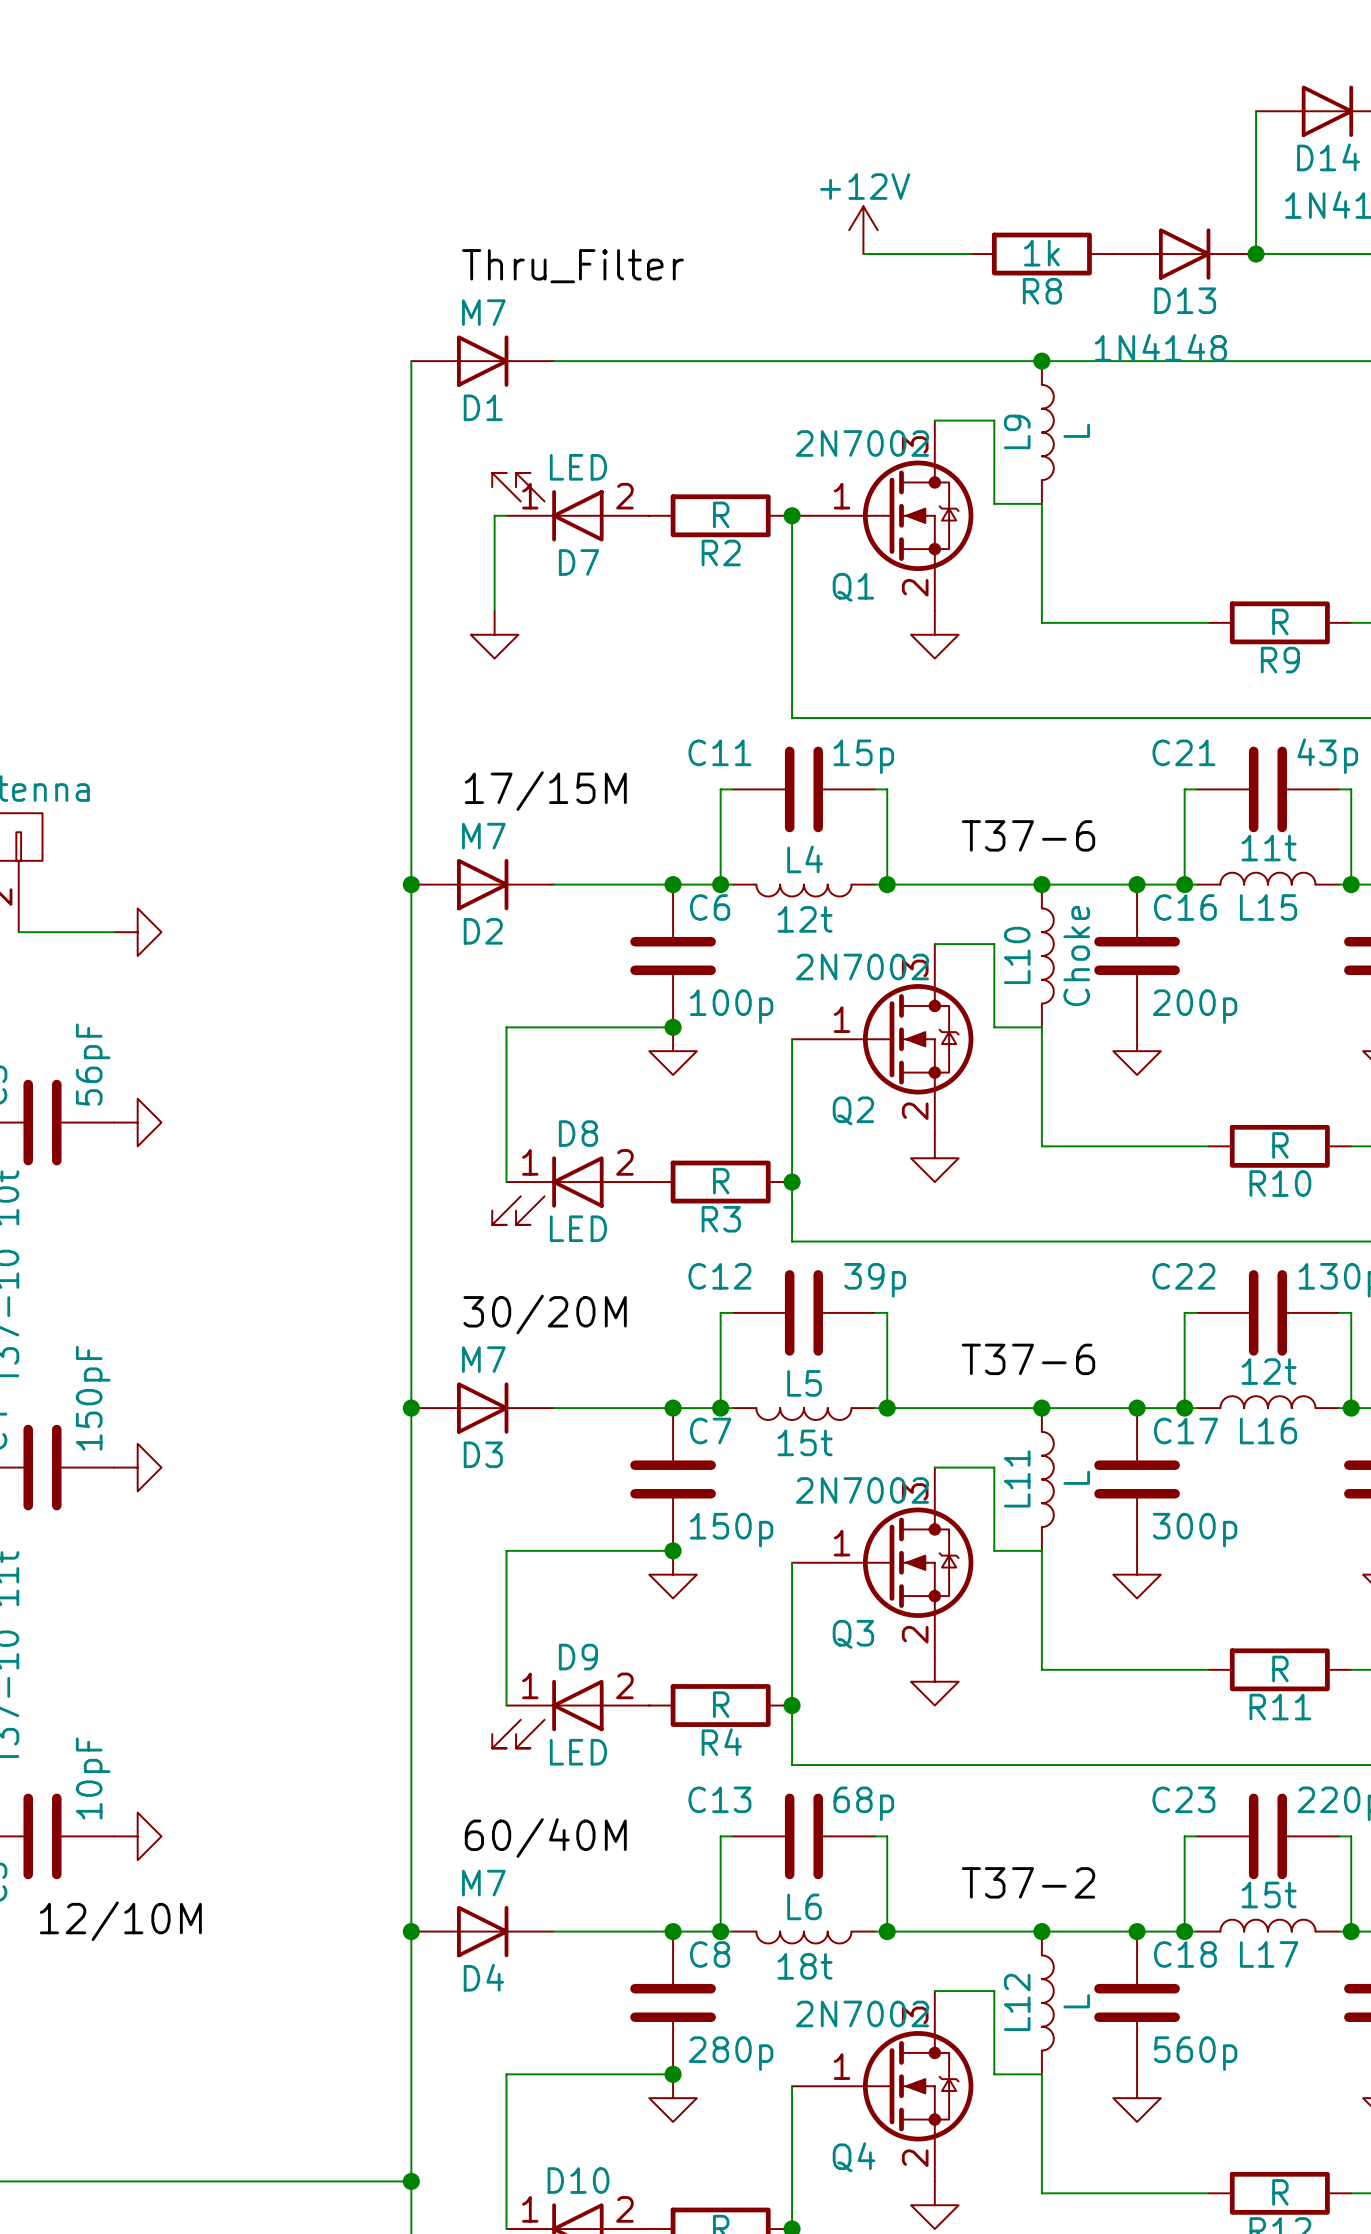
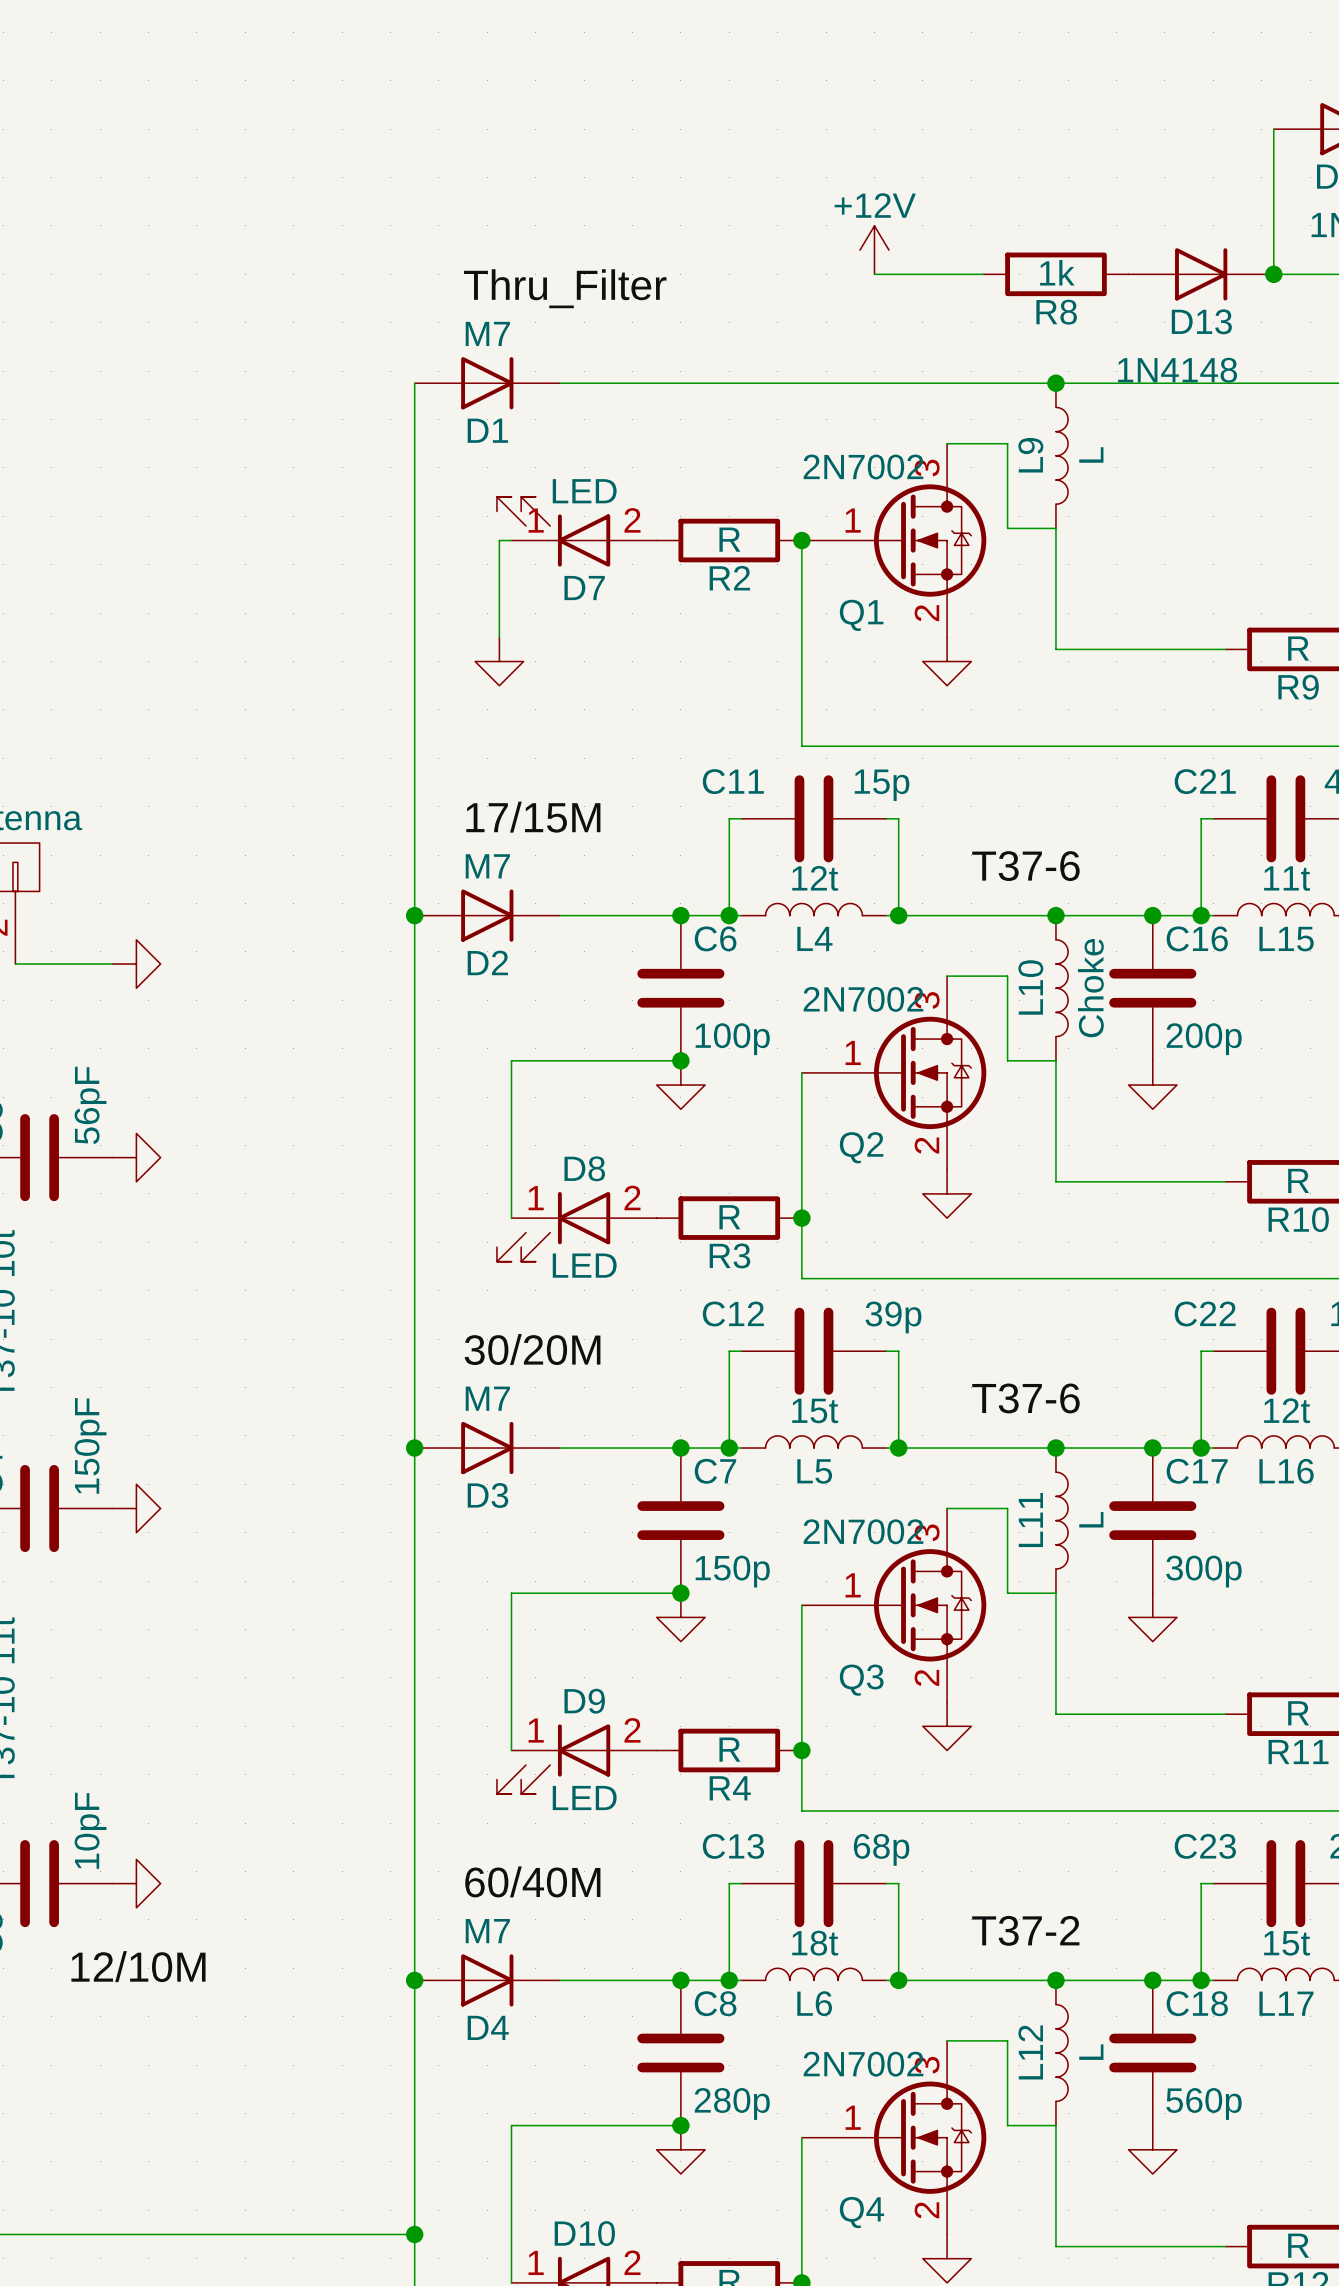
L4 rotation: 0° (803, 890) -> 180° (813, 909)
L5 rotation: 0° (803, 1414) -> 180° (813, 1441)
L6 rotation: 0° (803, 1937) -> 180° (813, 1974)

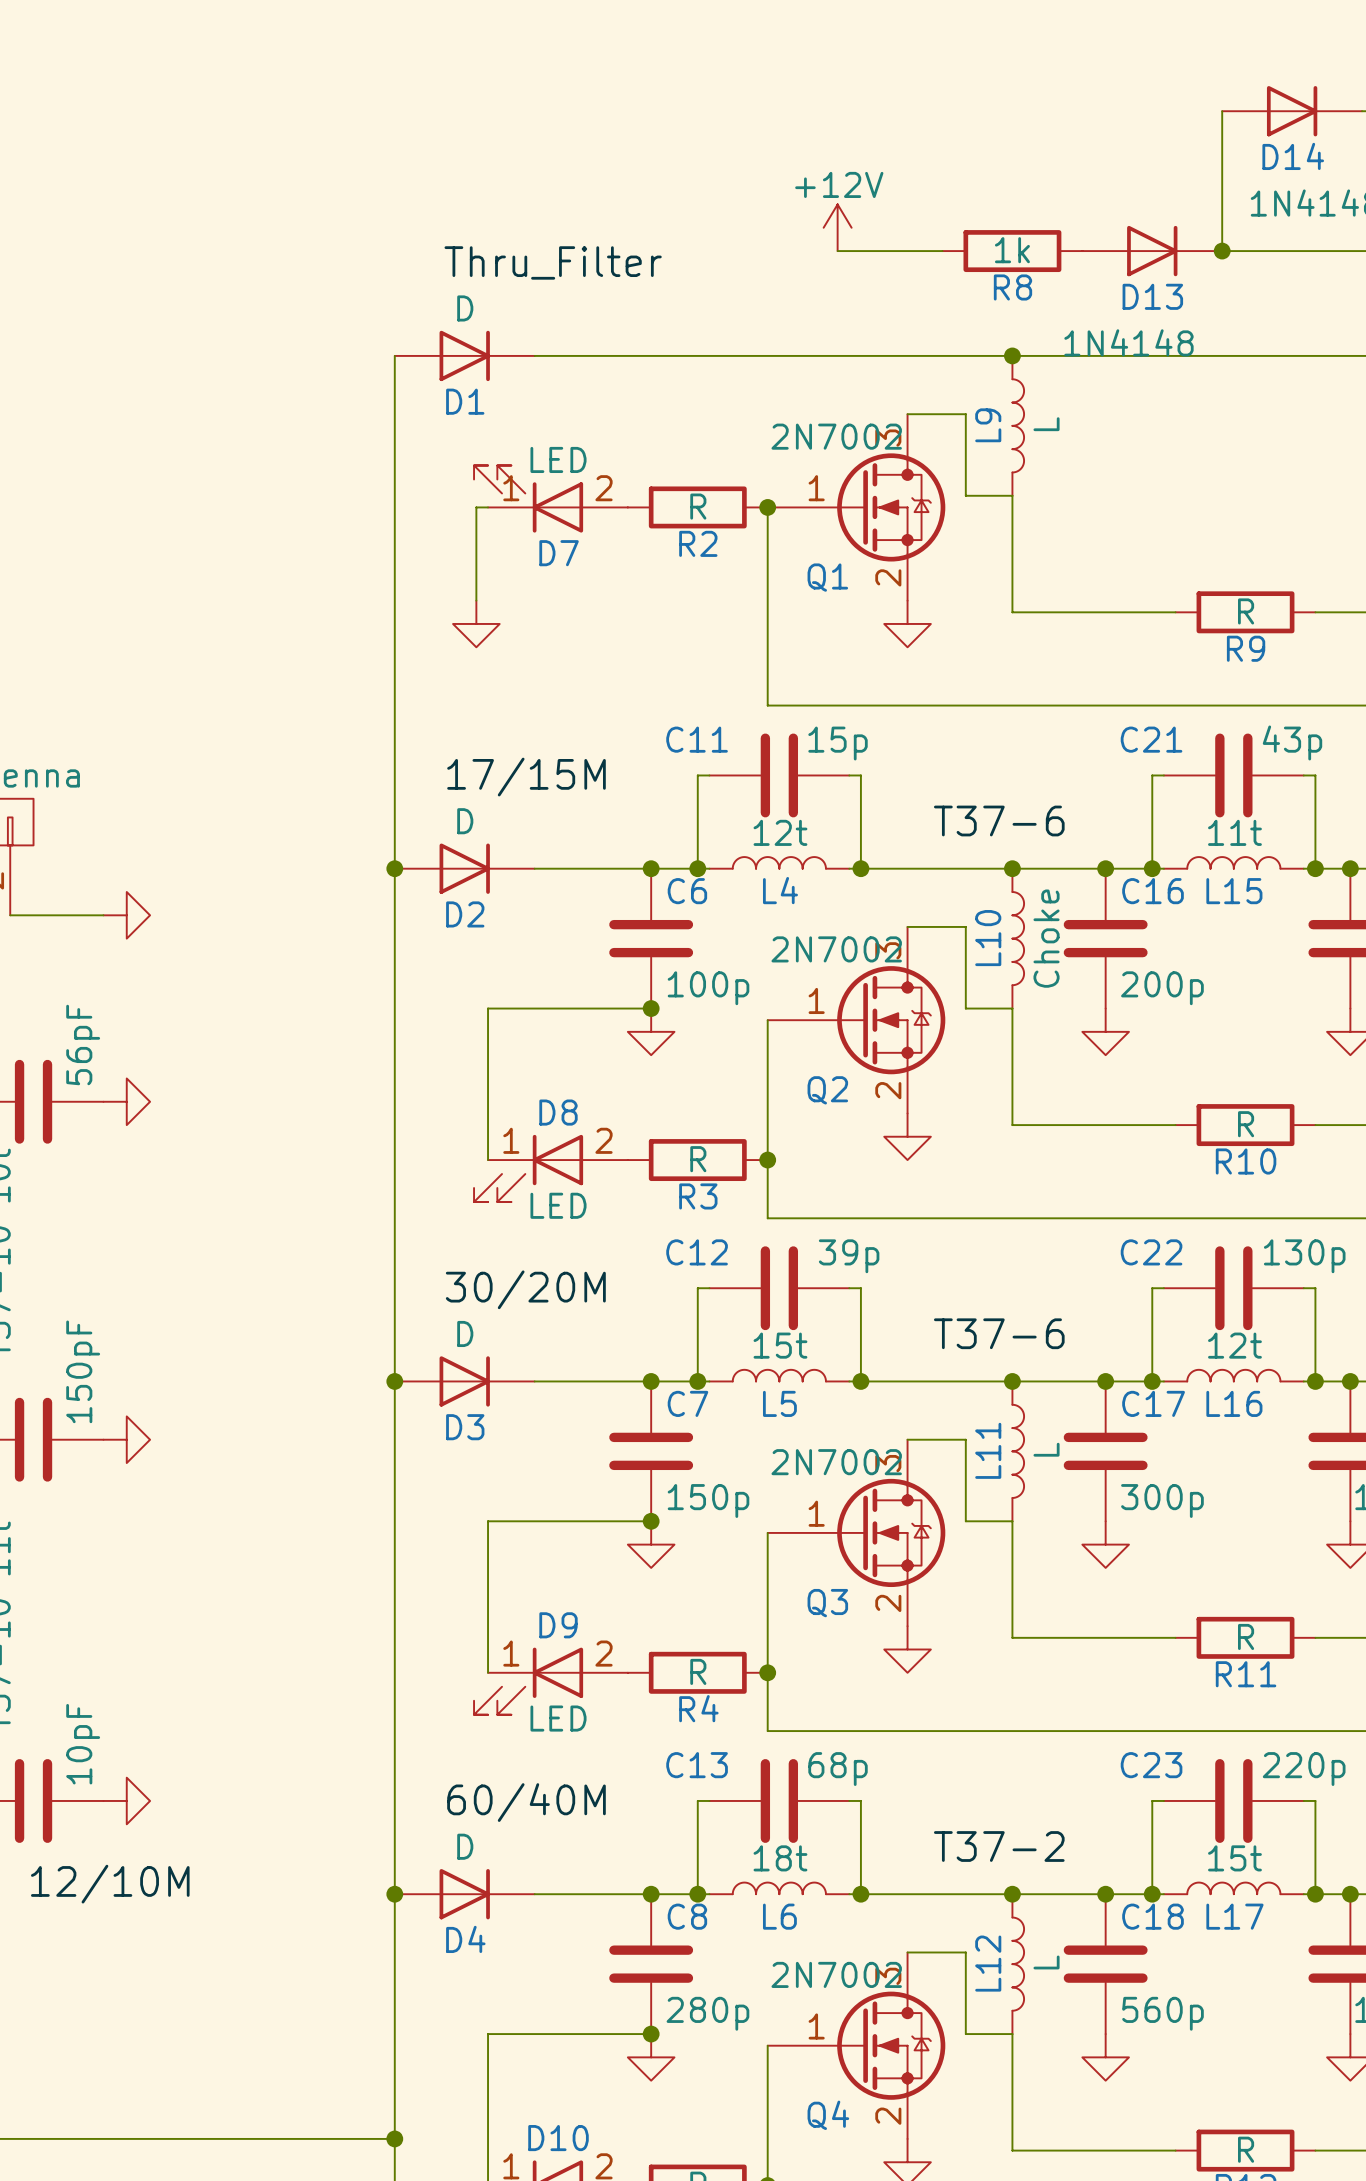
D1 value: M7 (487, 333) -> D (465, 308)
D2 value: M7 (487, 866) -> D (465, 821)
D3 value: M7 (487, 1398) -> D (465, 1333)
D4 value: M7 (487, 1931) -> D (465, 1846)

